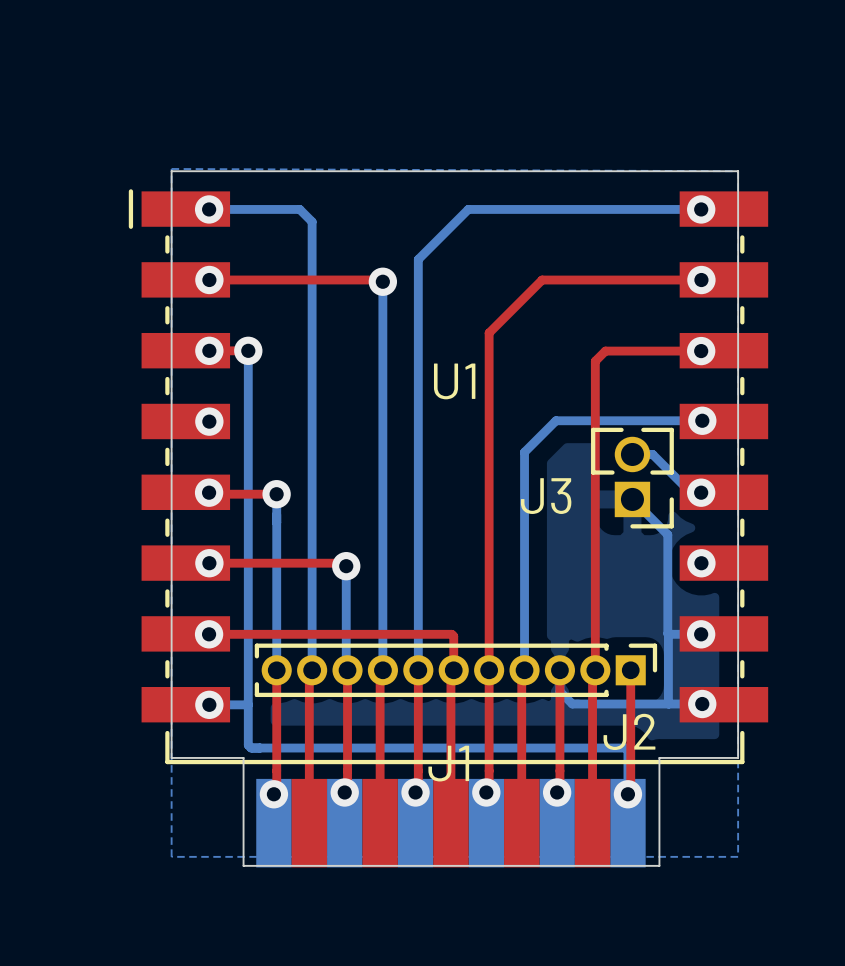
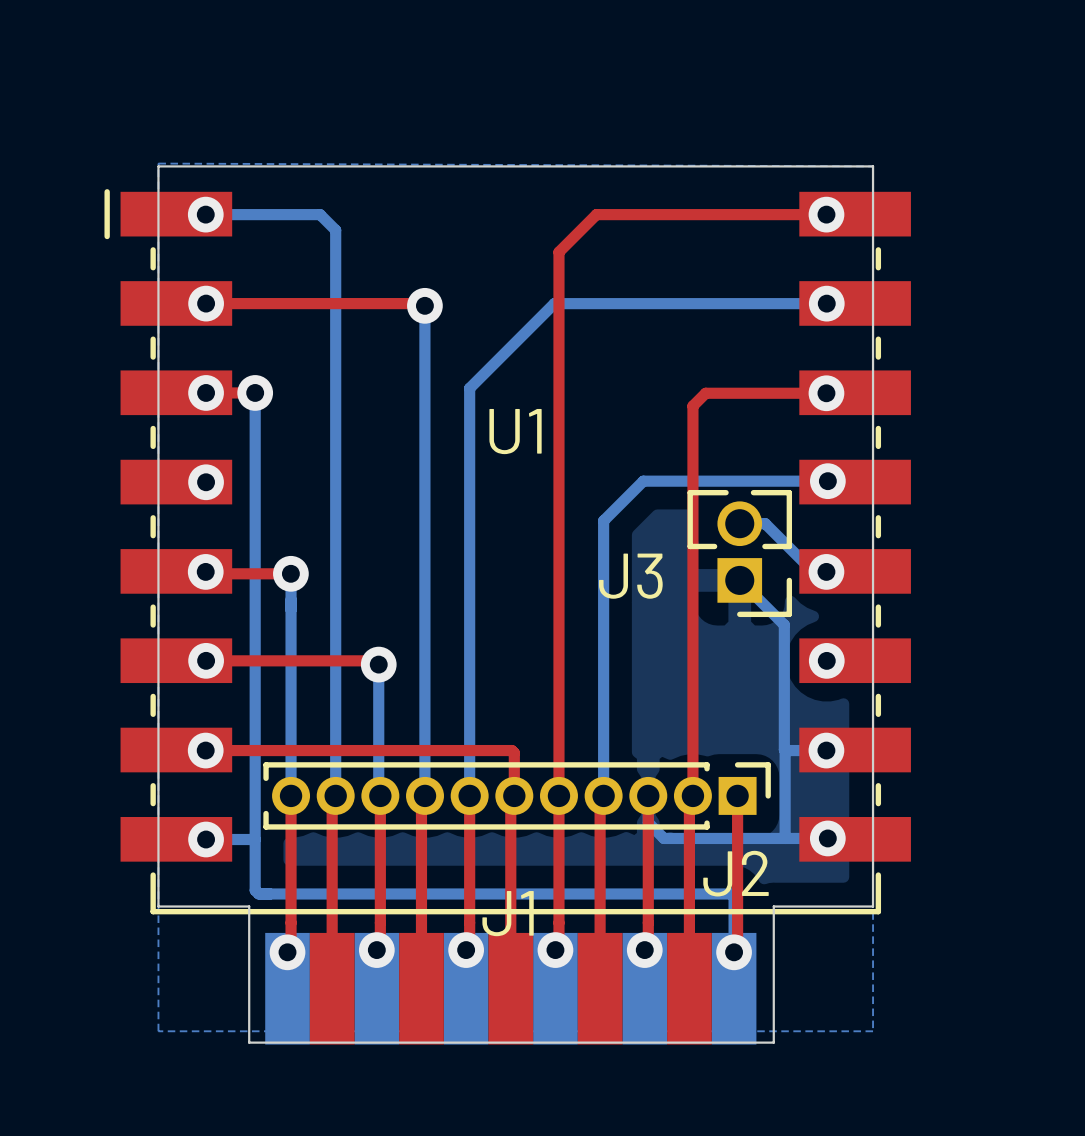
bottom track: (701, 209) (468, 209) (418, 259) (418, 347) -> (826, 303) (554, 303) (469, 388)
top track: (701, 280) (542, 280) (489, 333) -> (826, 214) (596, 214) (558, 252) (558, 370)

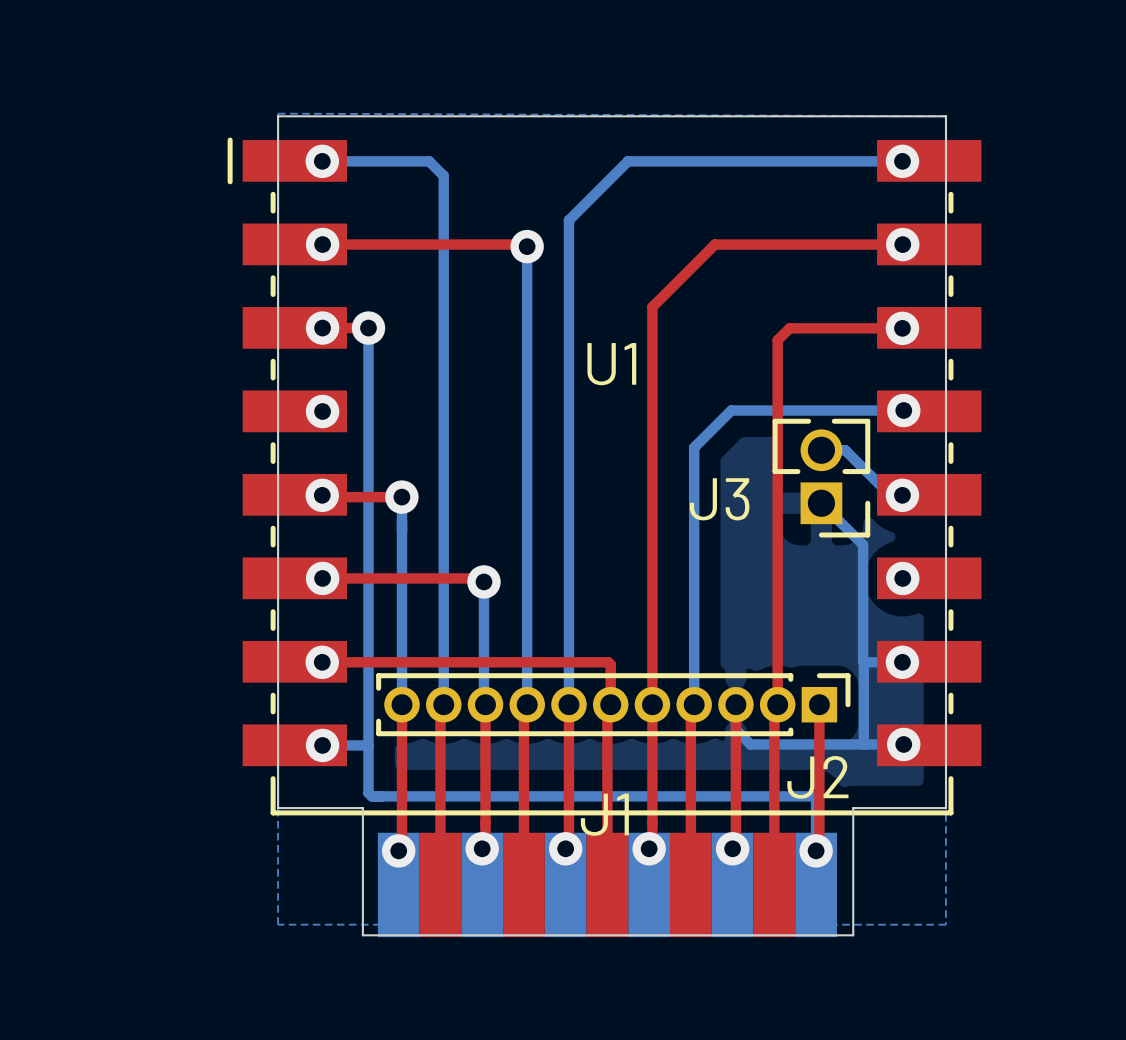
top track: (826, 214) (596, 214) (558, 252) (558, 370) -> (902, 244) (714, 244) (652, 307)
bottom track: (826, 303) (554, 303) (469, 388) -> (902, 161) (627, 161) (568, 220) (568, 323)

